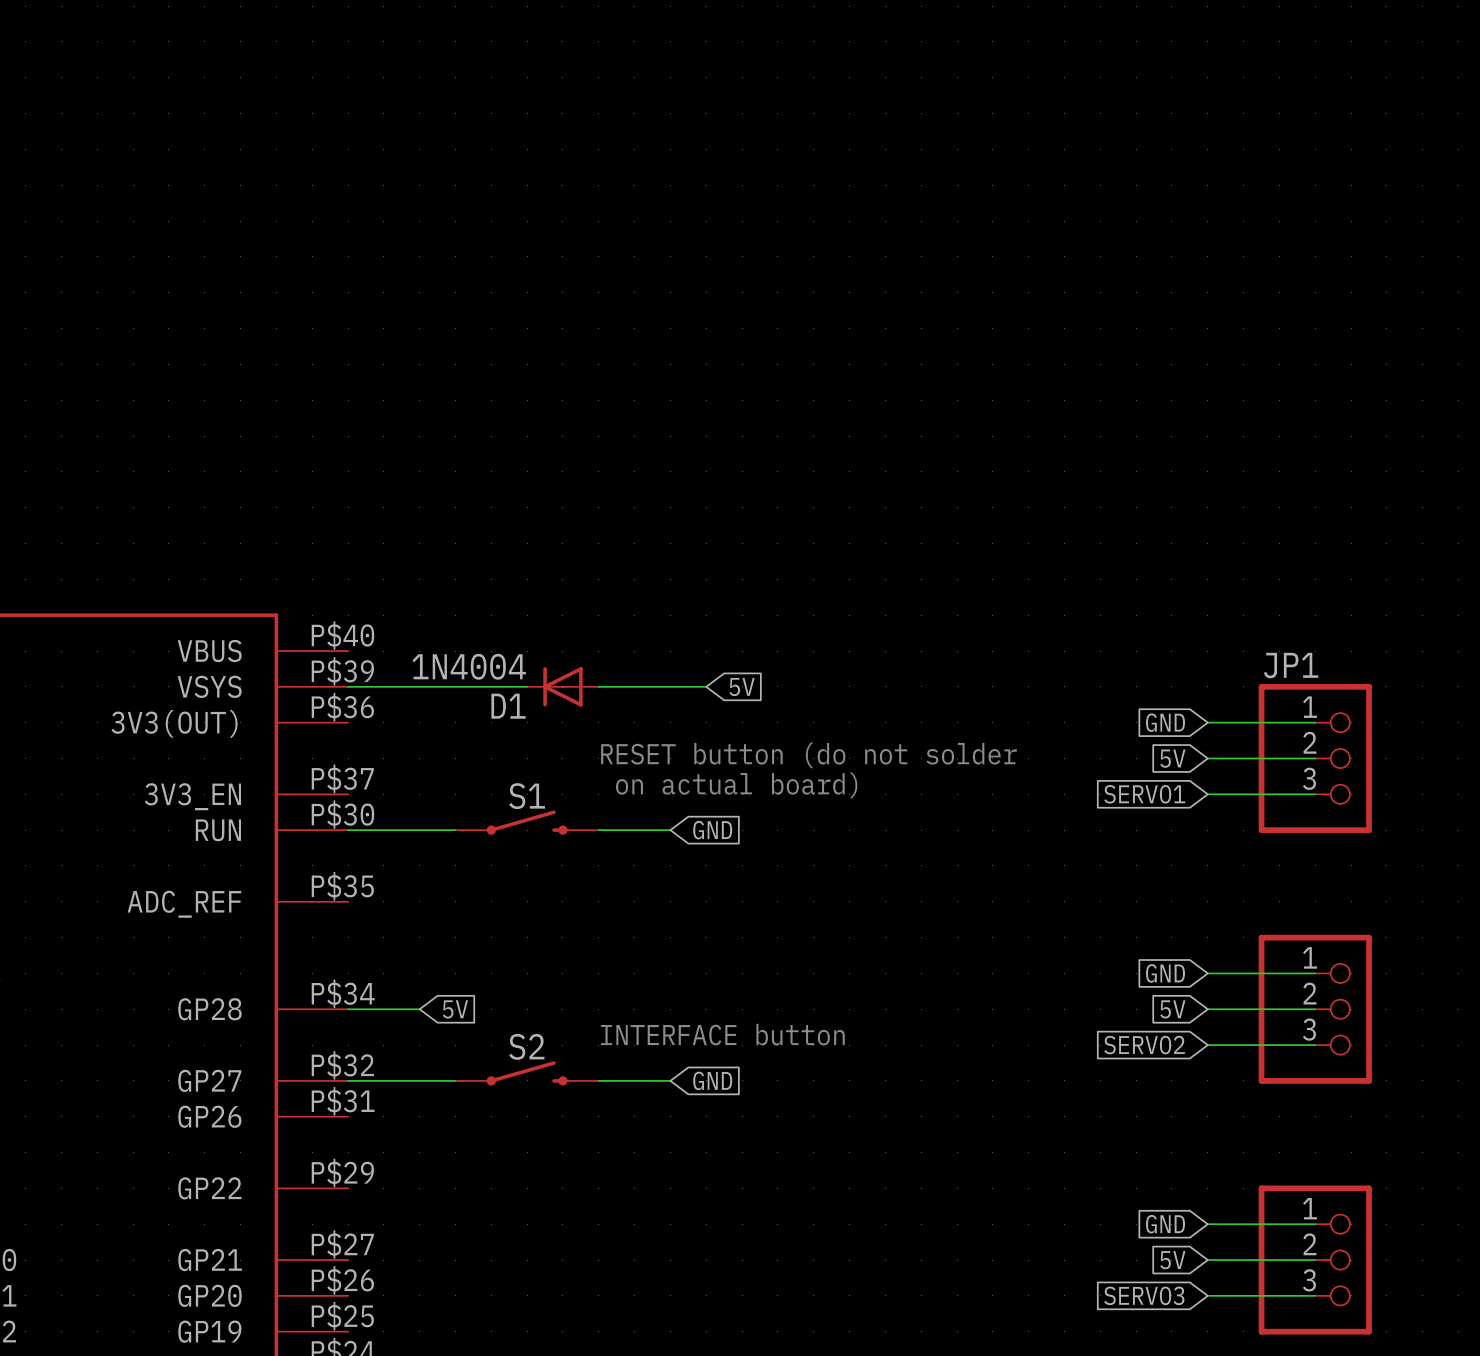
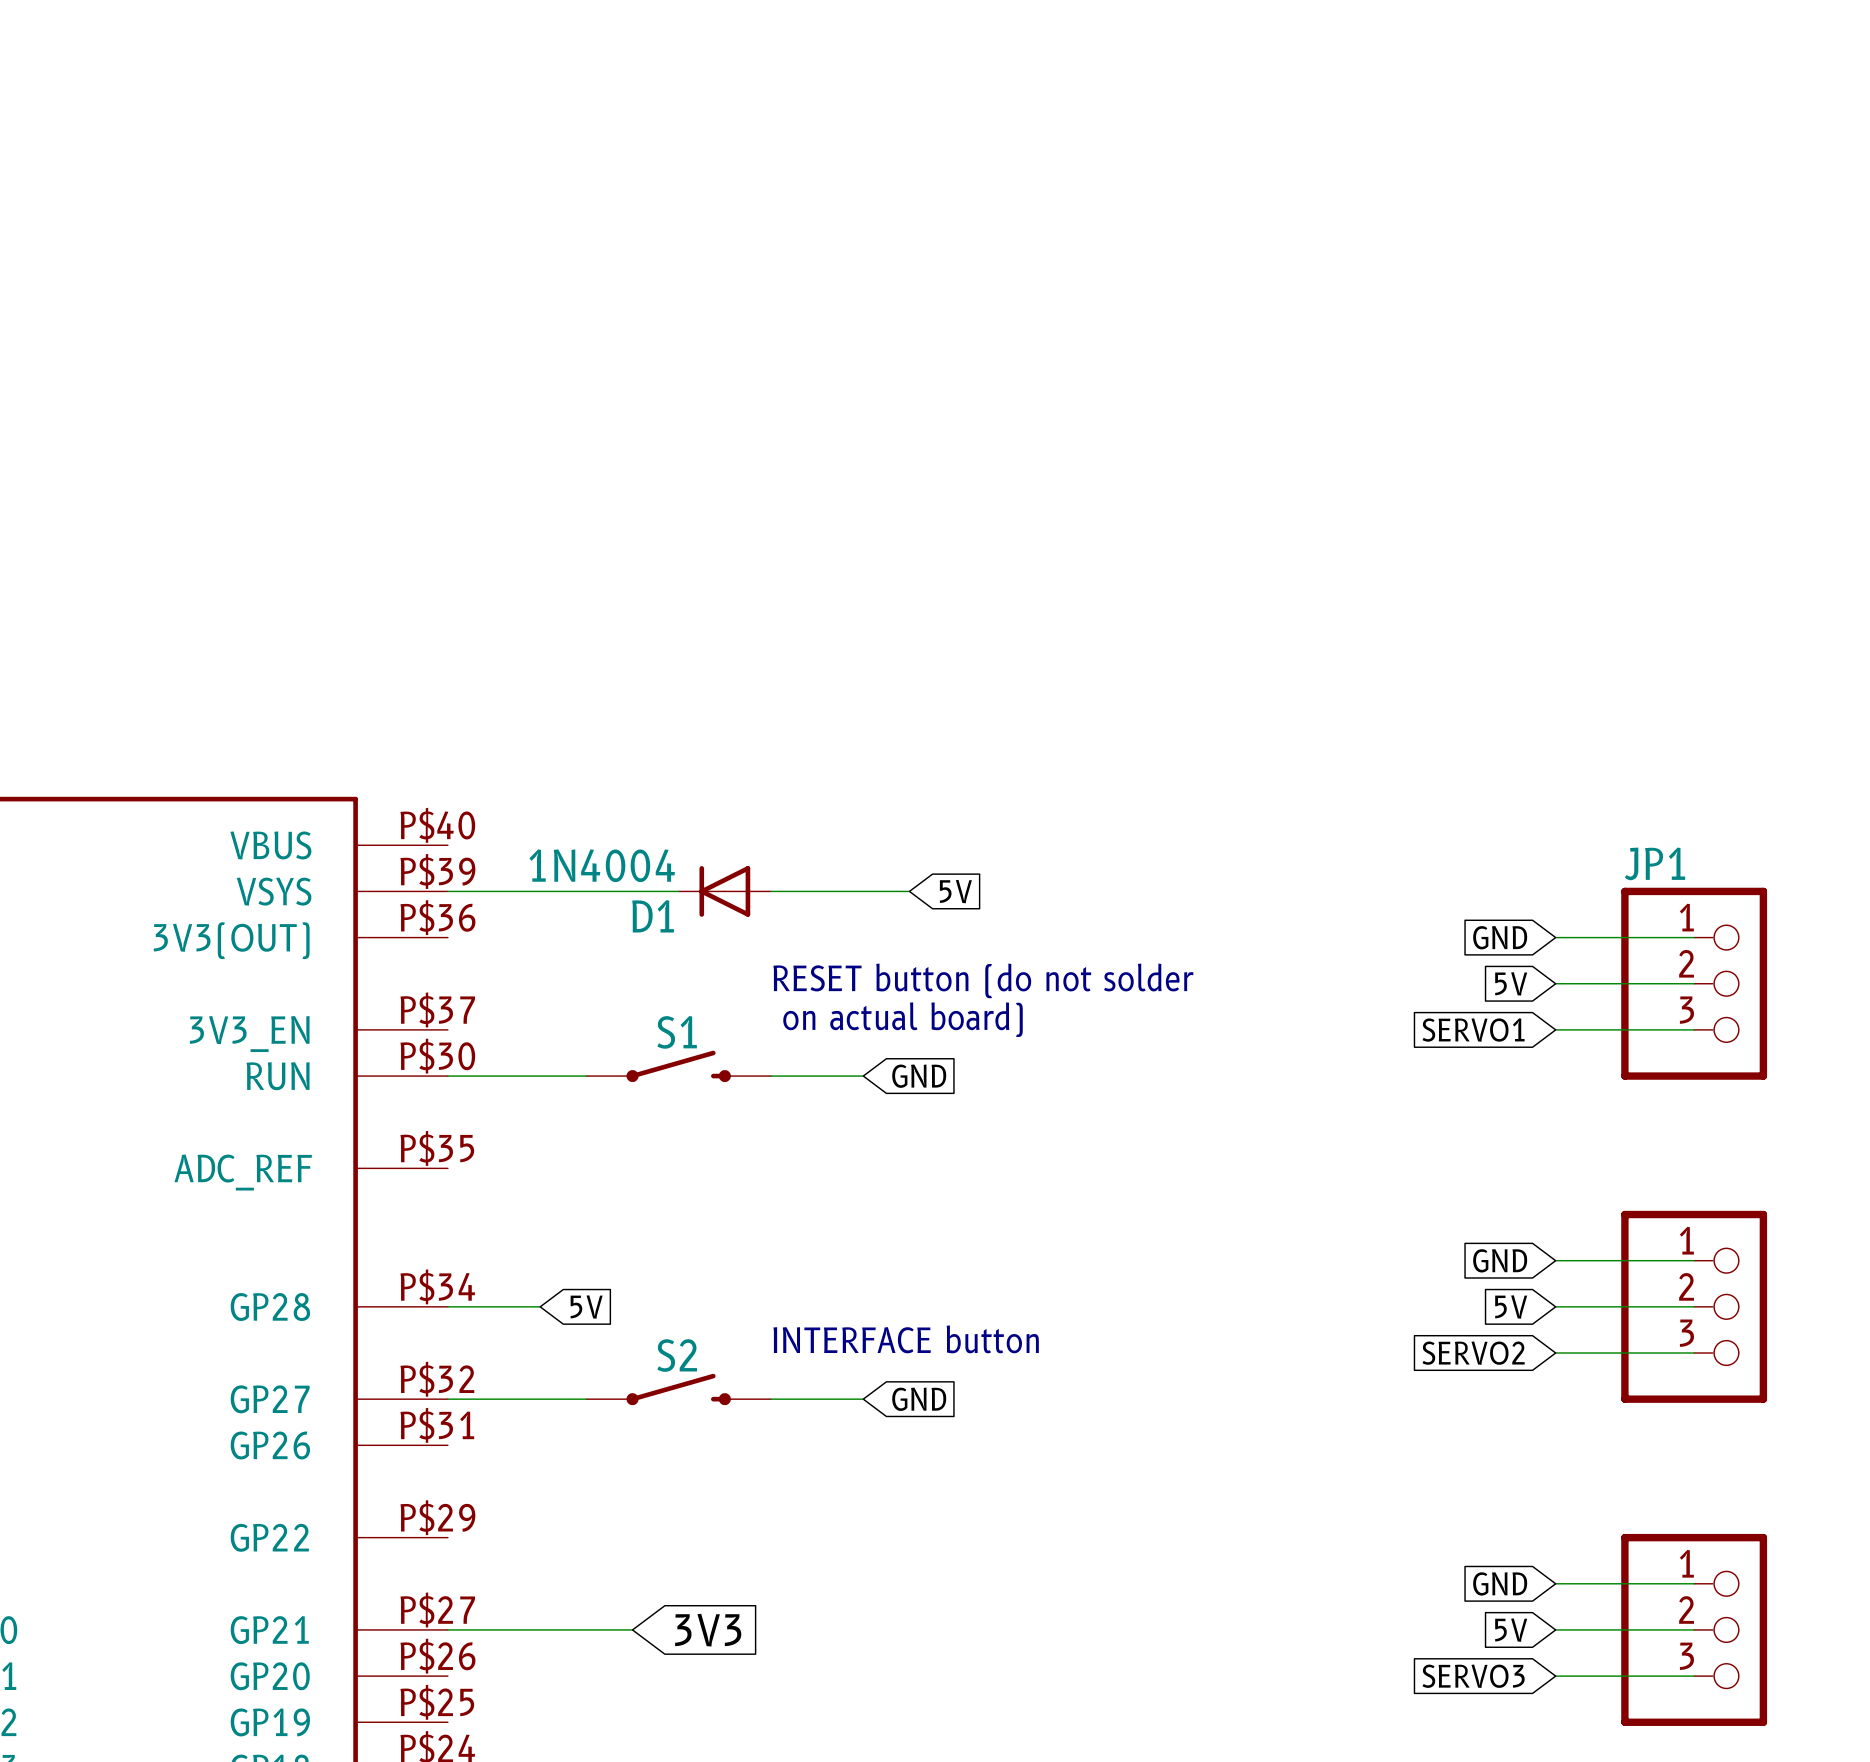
wire: none -> (447, 1629) (632, 1629)
global label: none -> 3V3 (708, 1630)

